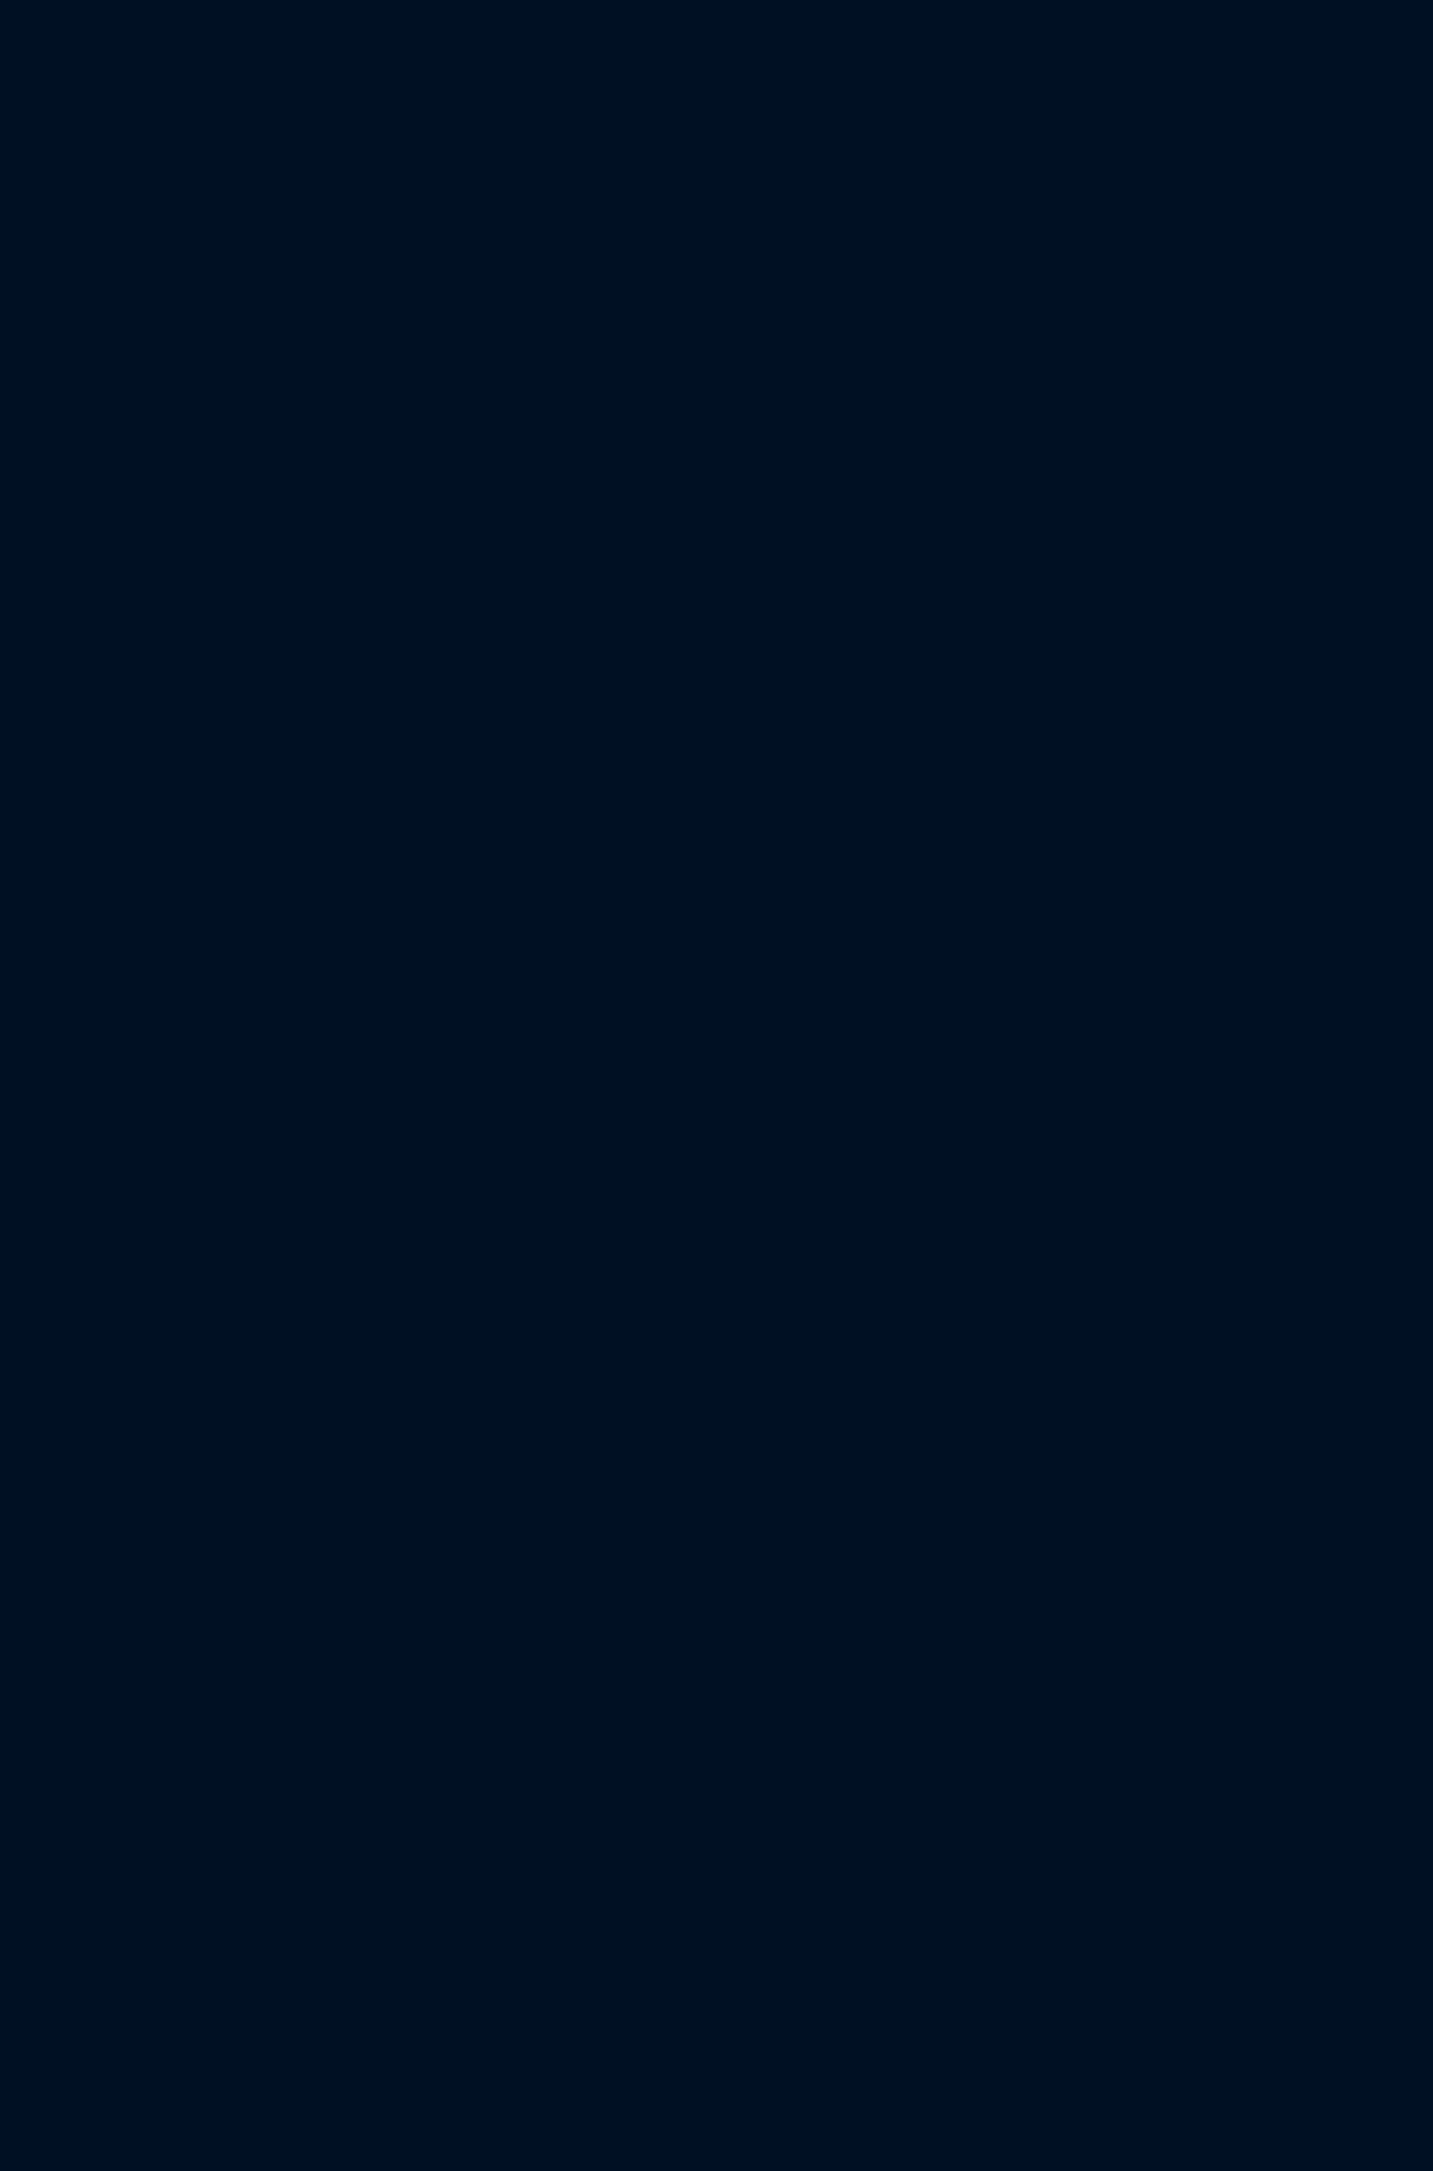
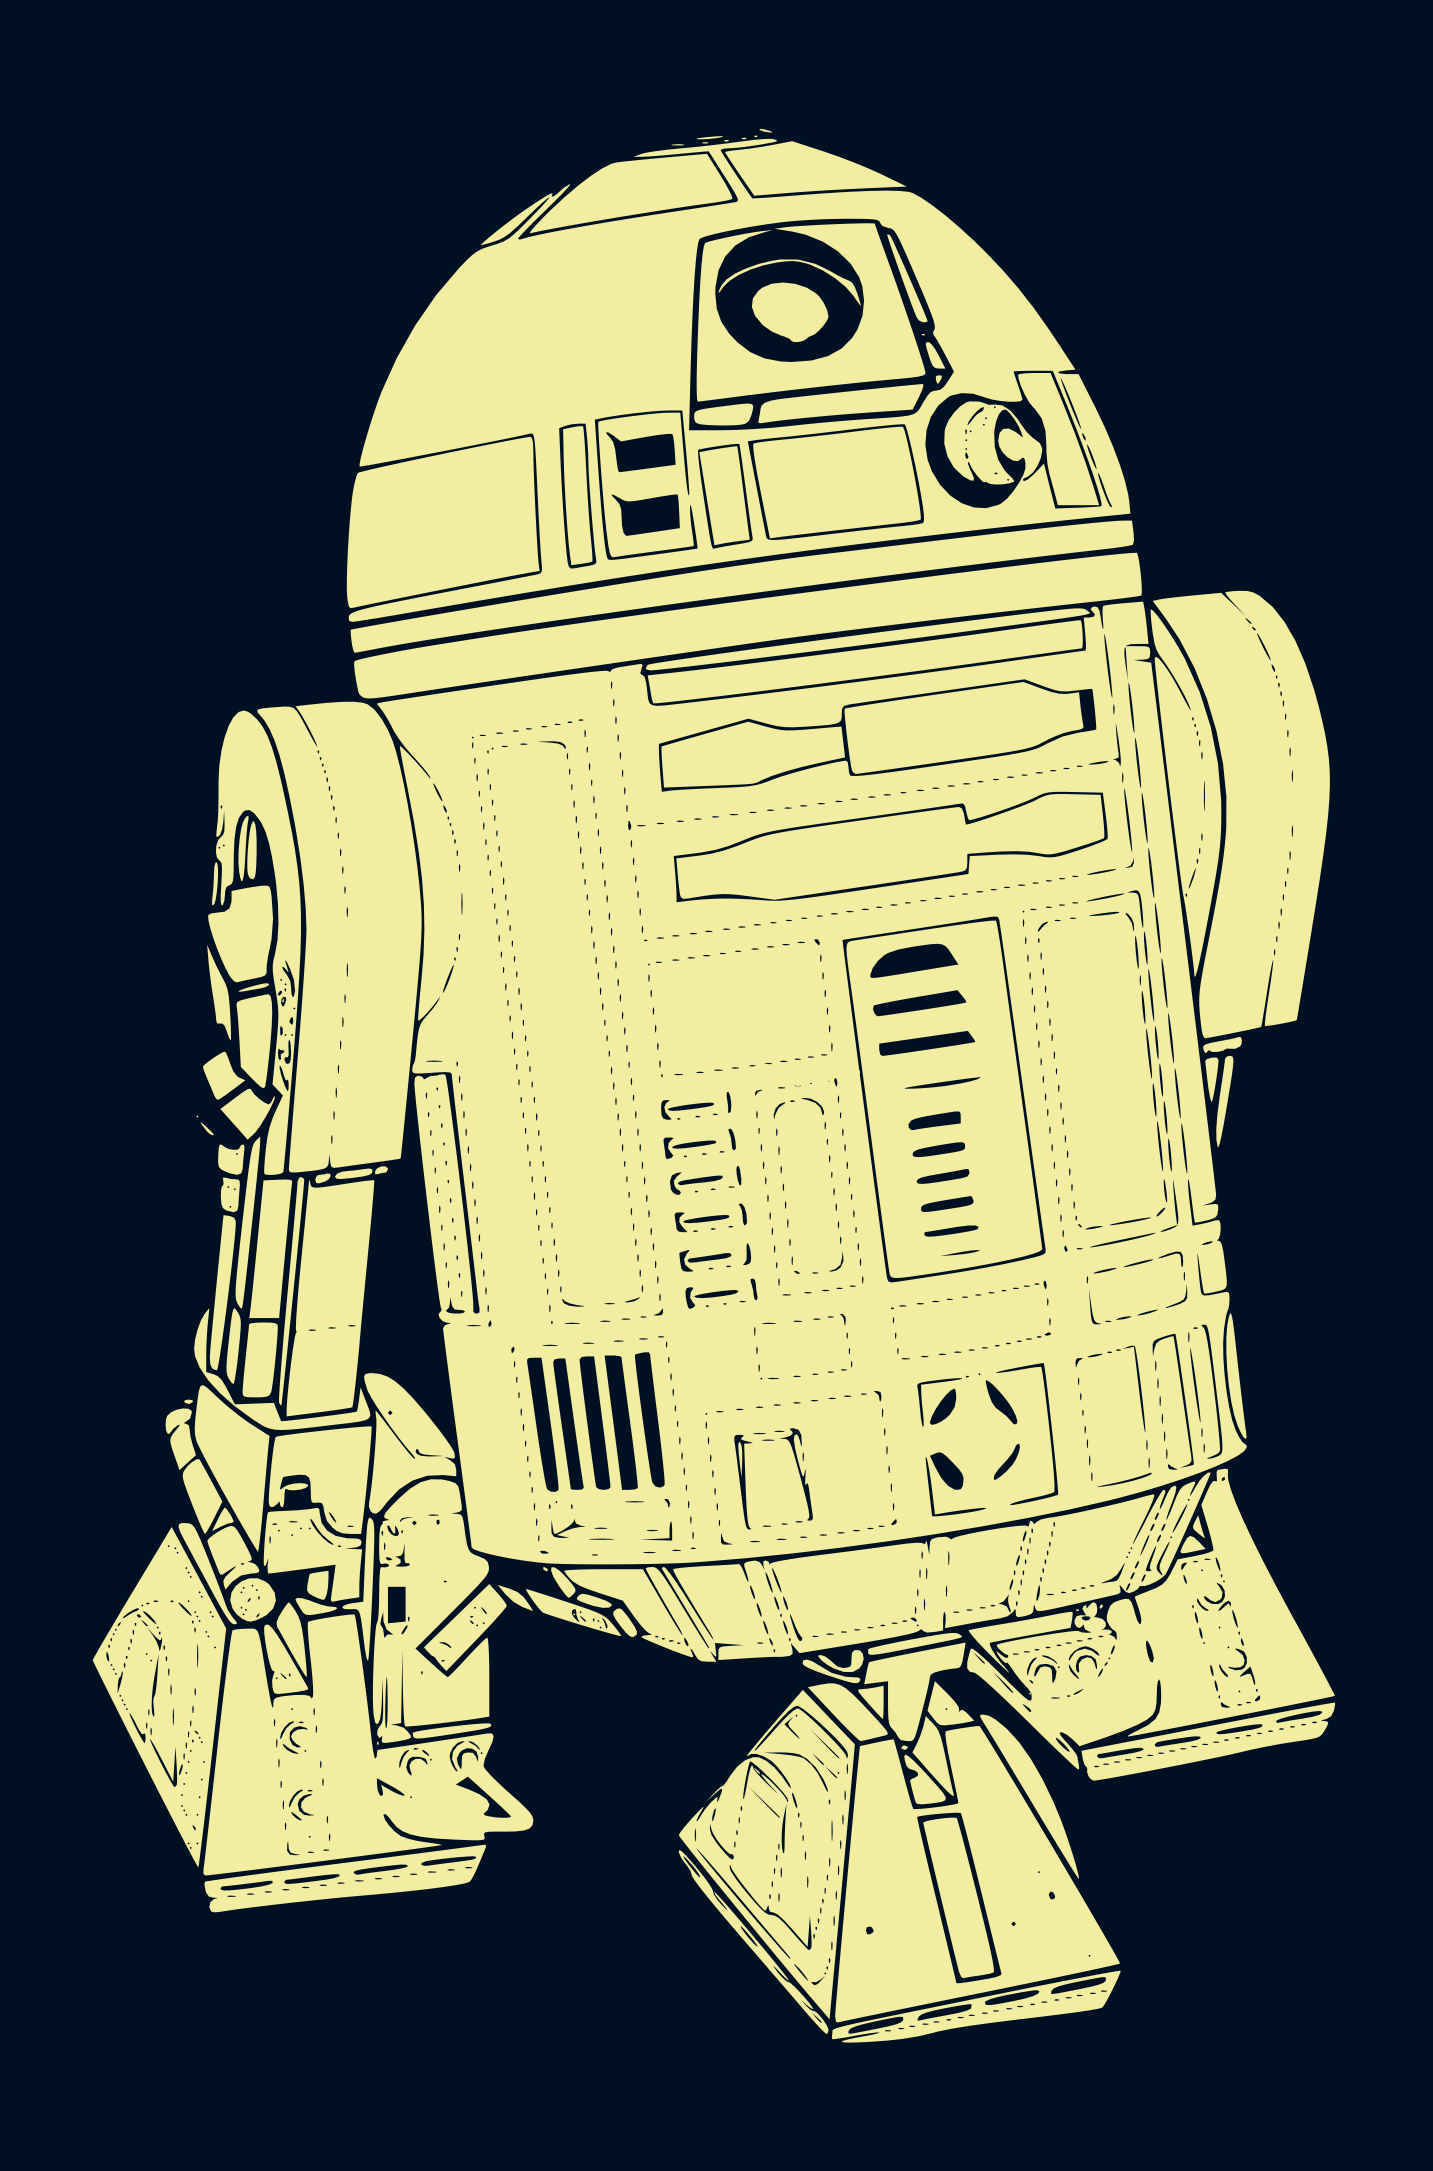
part: none -> (713, 1085)

